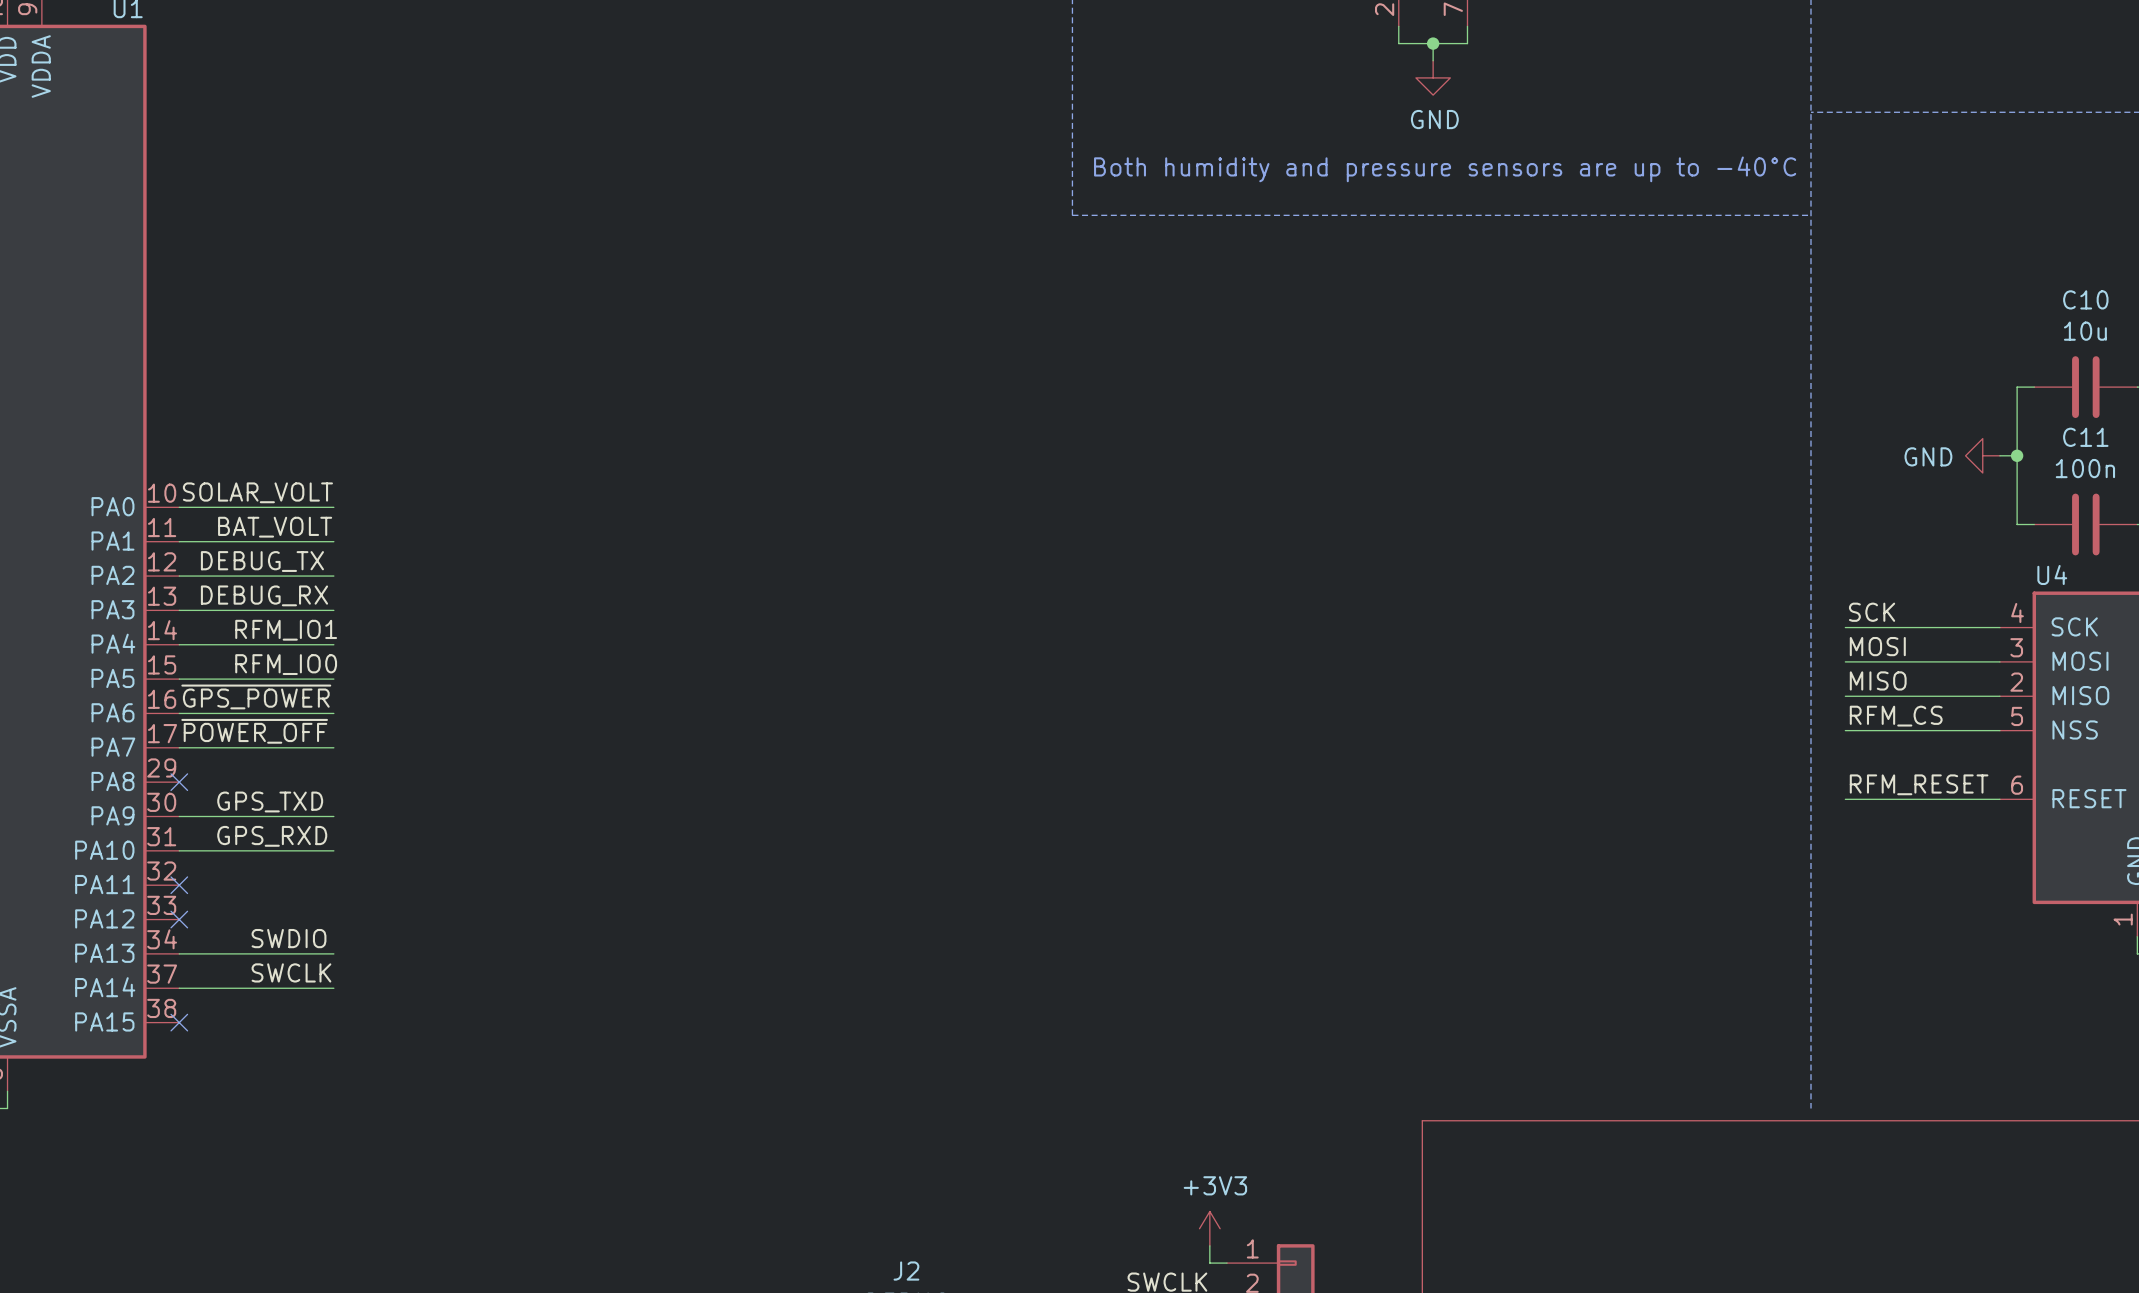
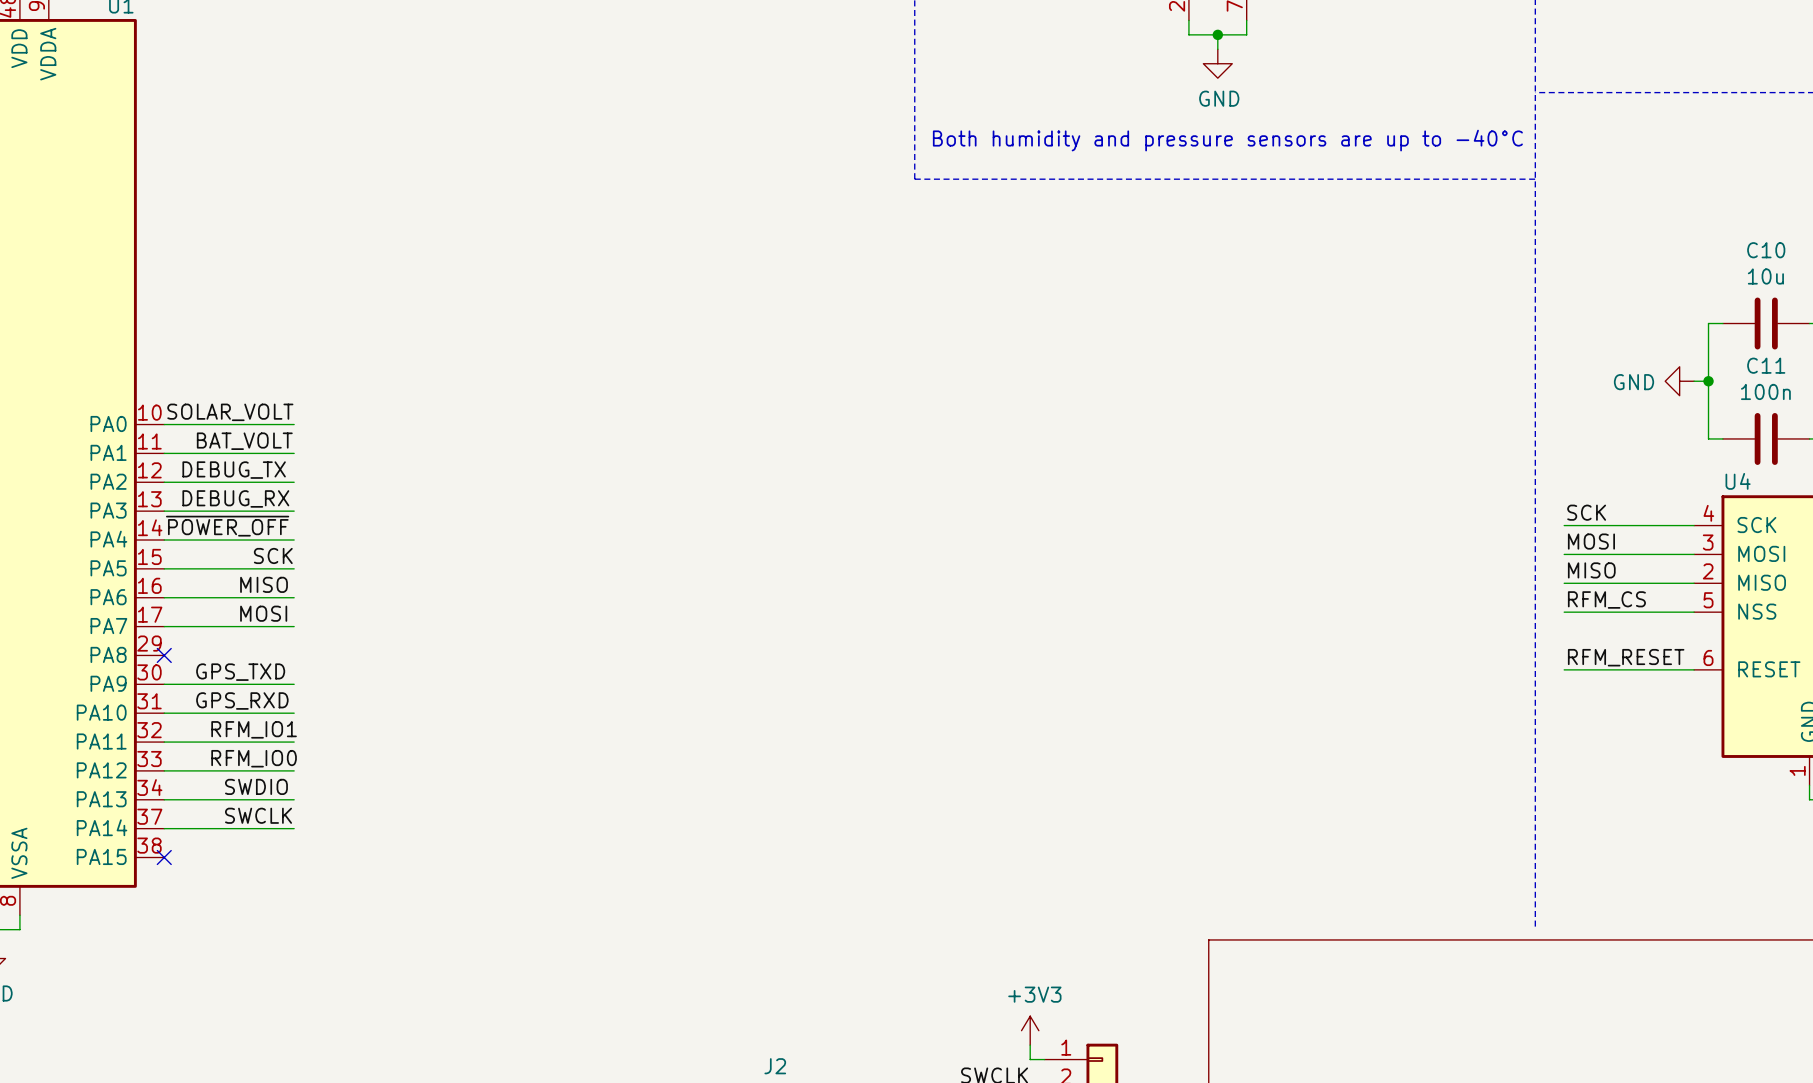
label position: RFM_IO1 (286, 630) -> RFM_IO1 (254, 729)
label: none -> SCK (273, 555)
label position: RFM_IO0 (286, 664) -> RFM_IO0 (254, 758)
label: ~{GPS_POWER} (256, 696) -> none
label: none -> MISO (264, 584)
label position: ~{POWER_OFF} (254, 731) -> ~{POWER_OFF} (227, 526)
label: none -> MOSI (263, 613)
wire: none -> (164, 742) (294, 742)
no-connect mark: (179, 885) -> none
wire: none -> (164, 770) (294, 770)
no-connect mark: (179, 919) -> none

